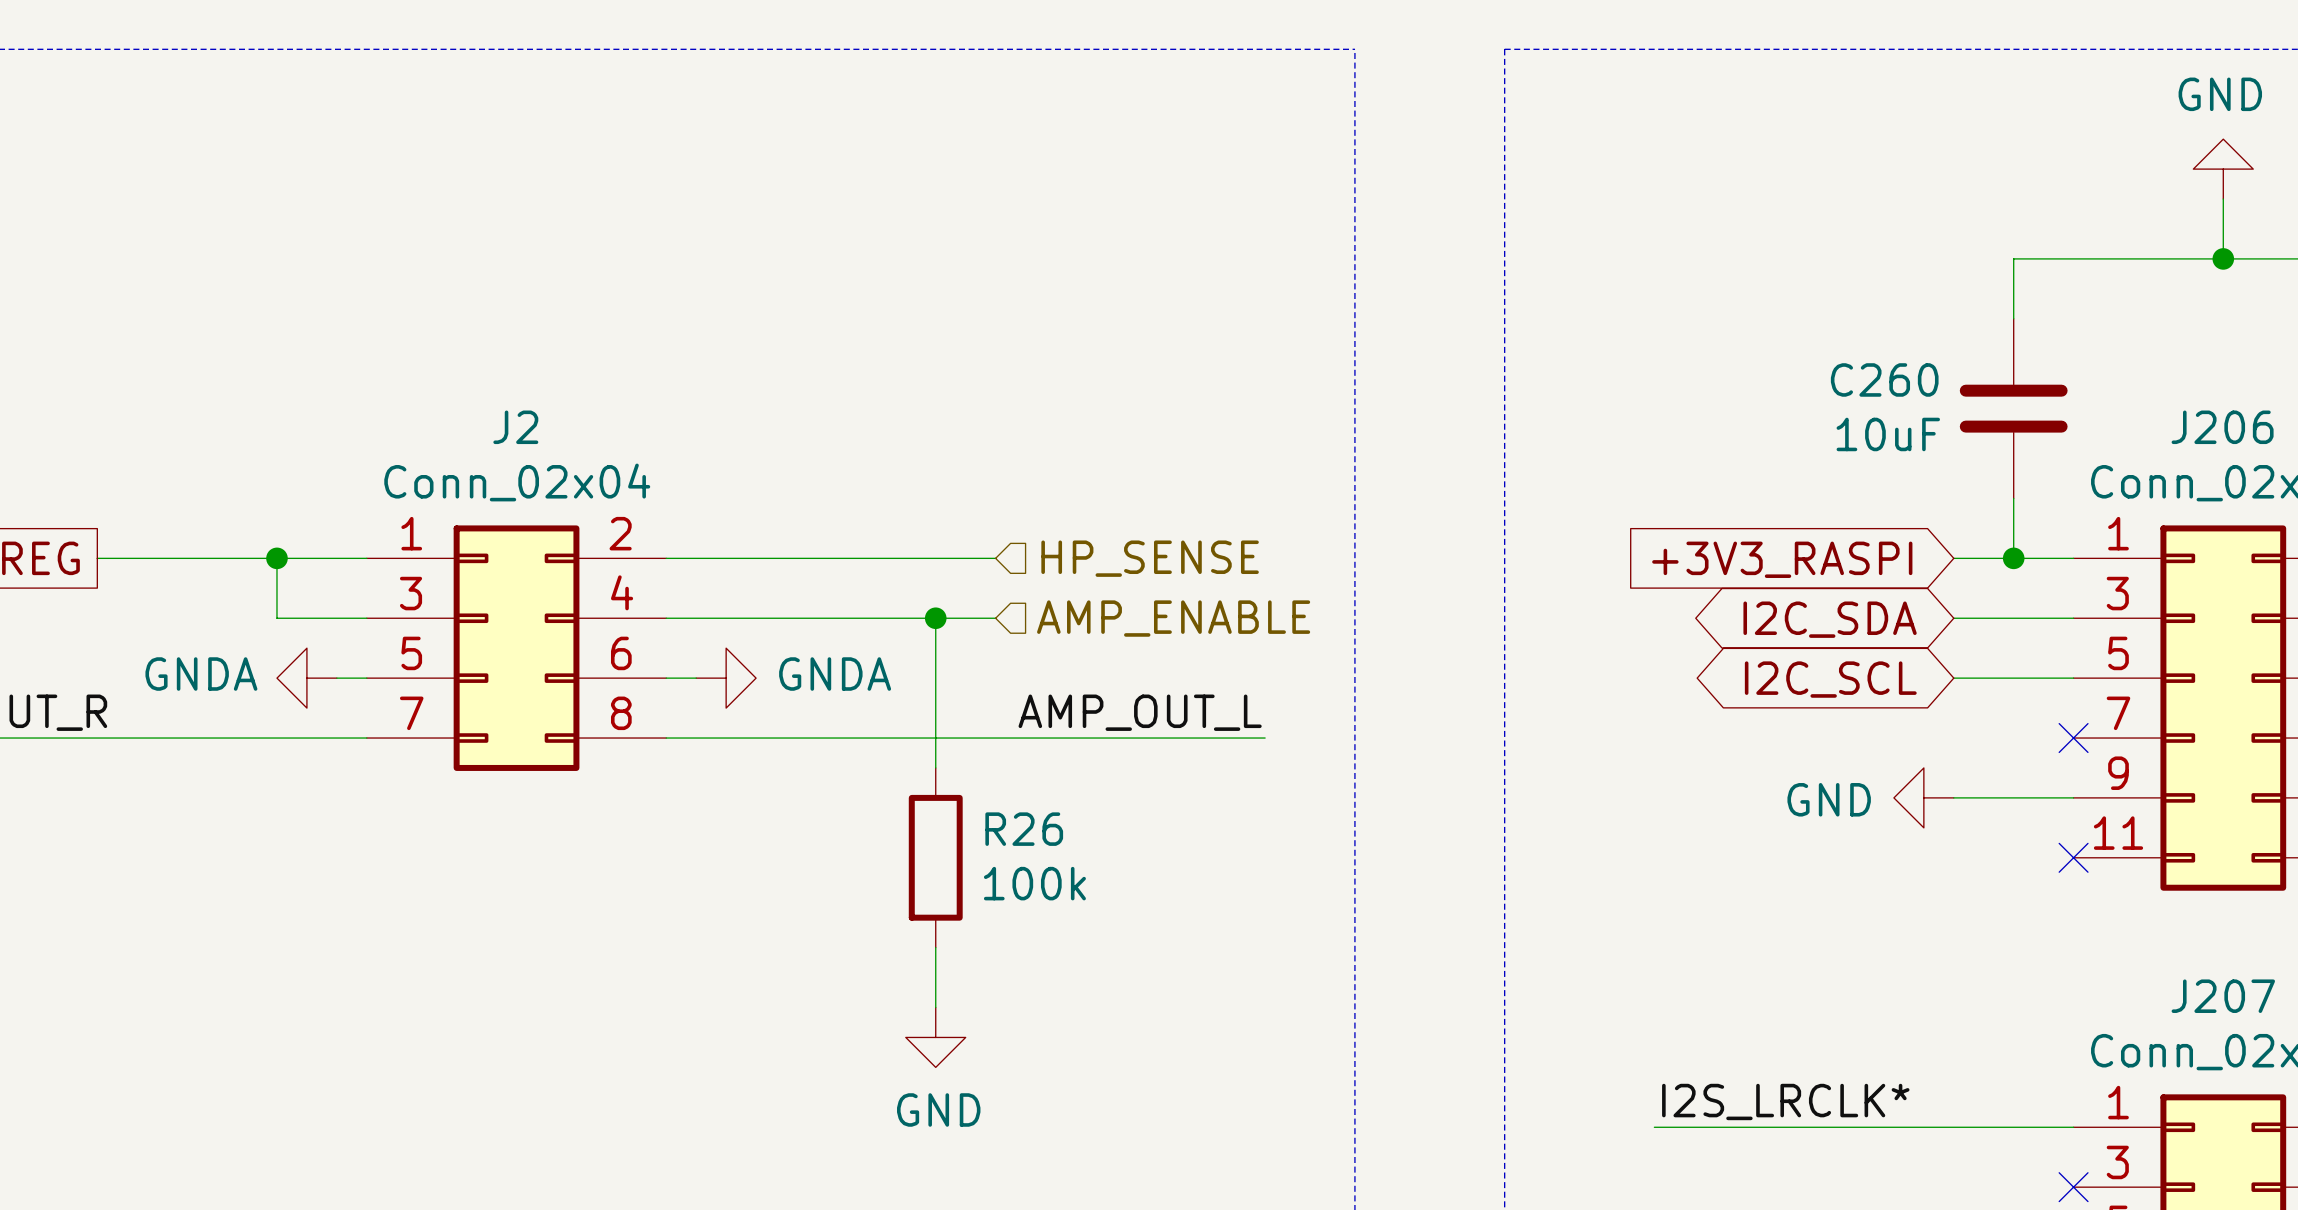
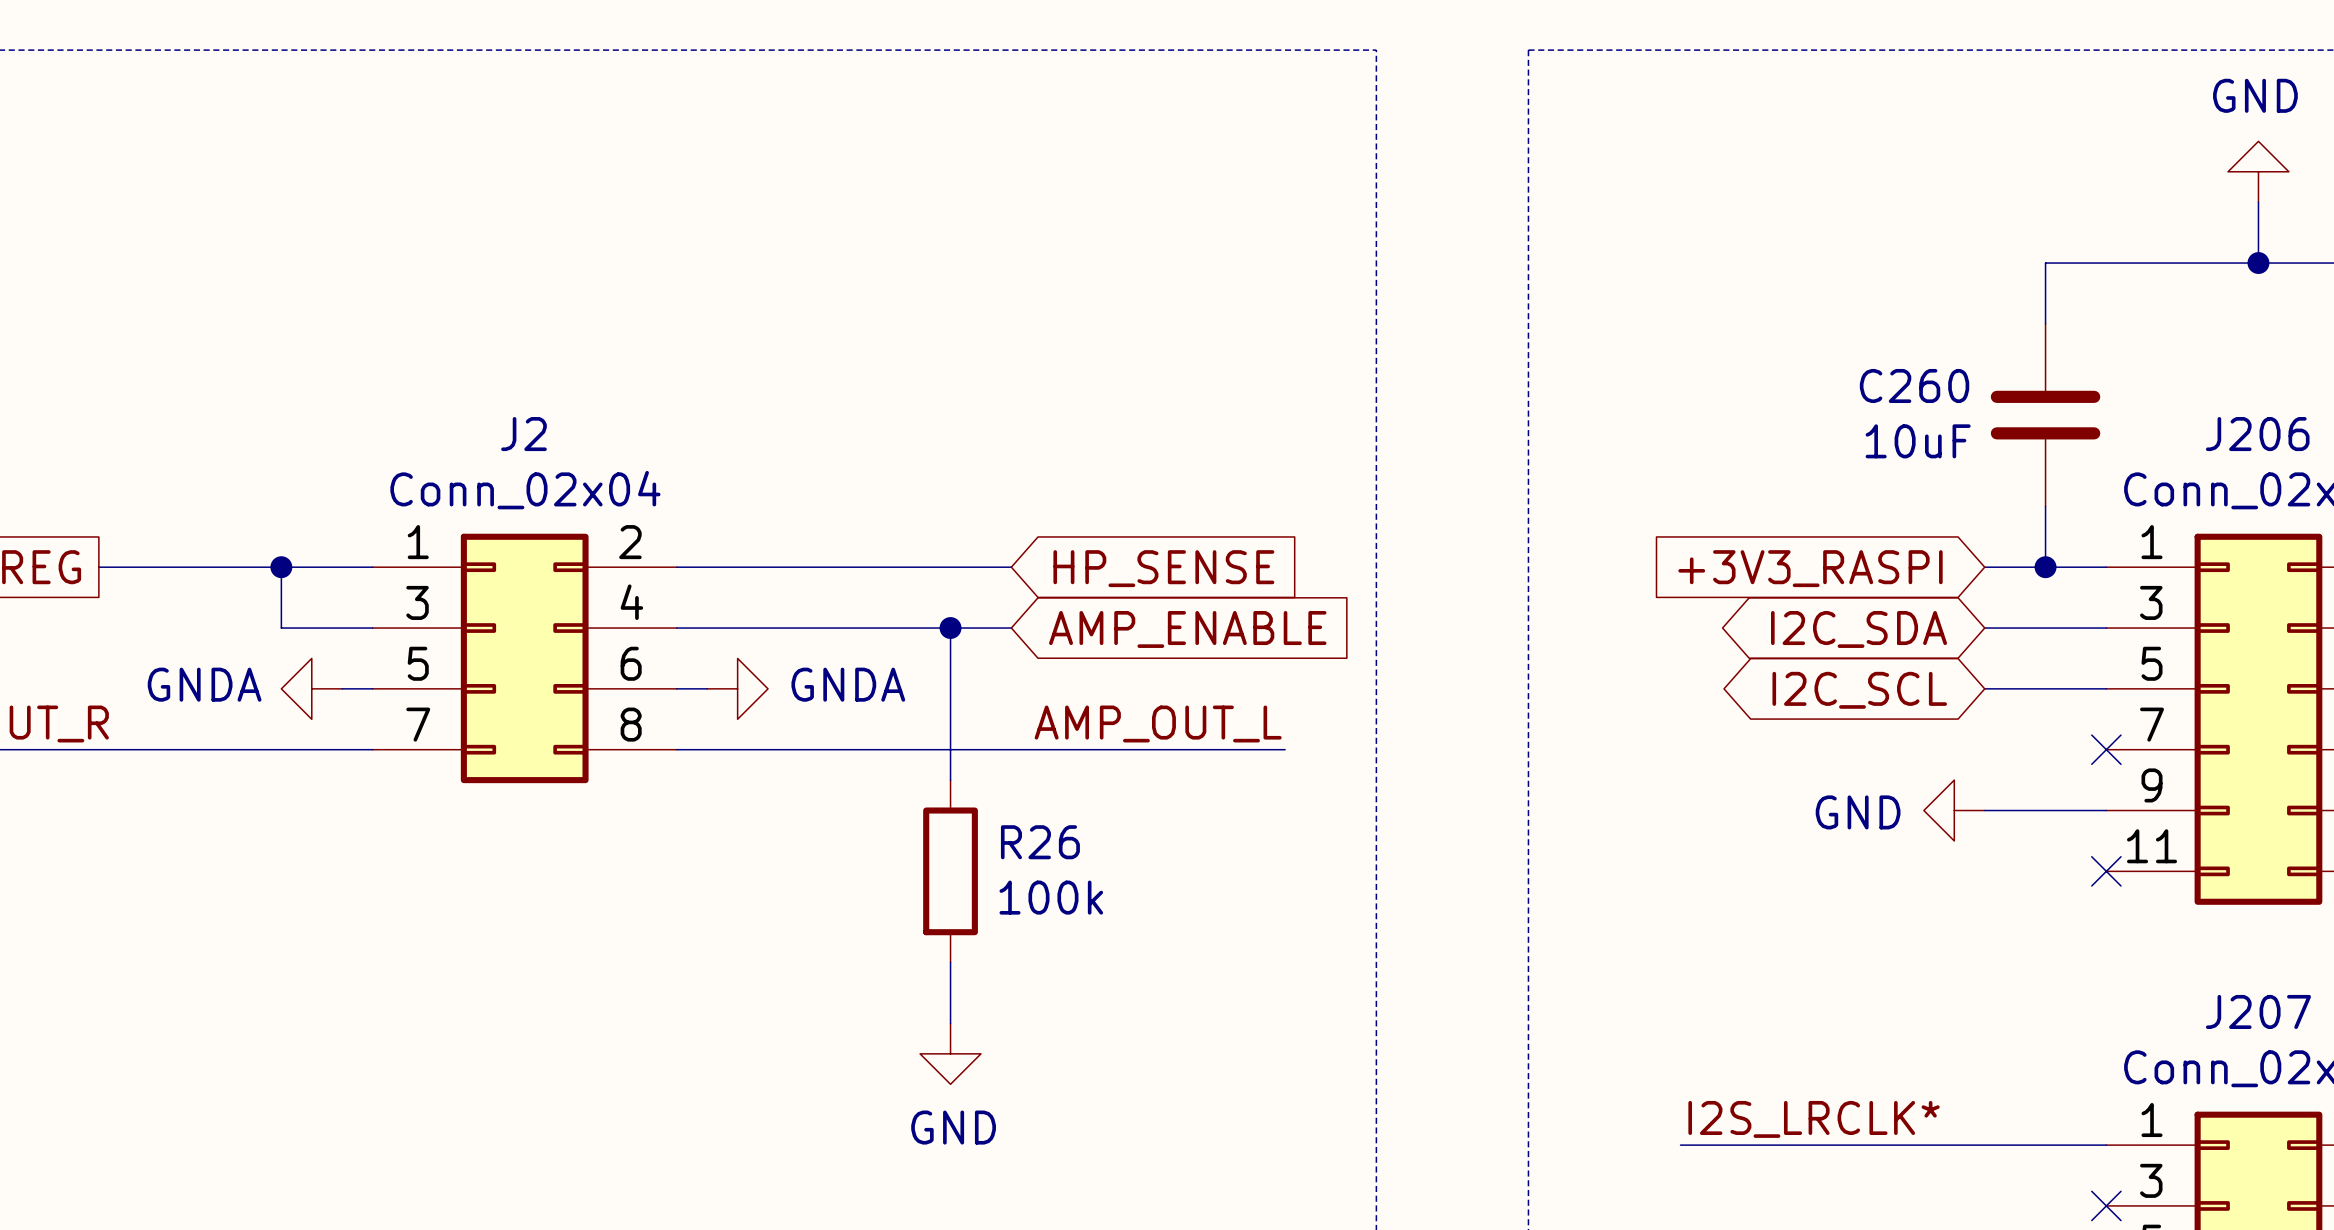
hierarchical label: HP_SENSE (1150, 558) -> none
global label: none -> HP_SENSE (1163, 568)
hierarchical label: AMP_ENABLE (1173, 618) -> none
global label: none -> AMP_ENABLE (1187, 629)

